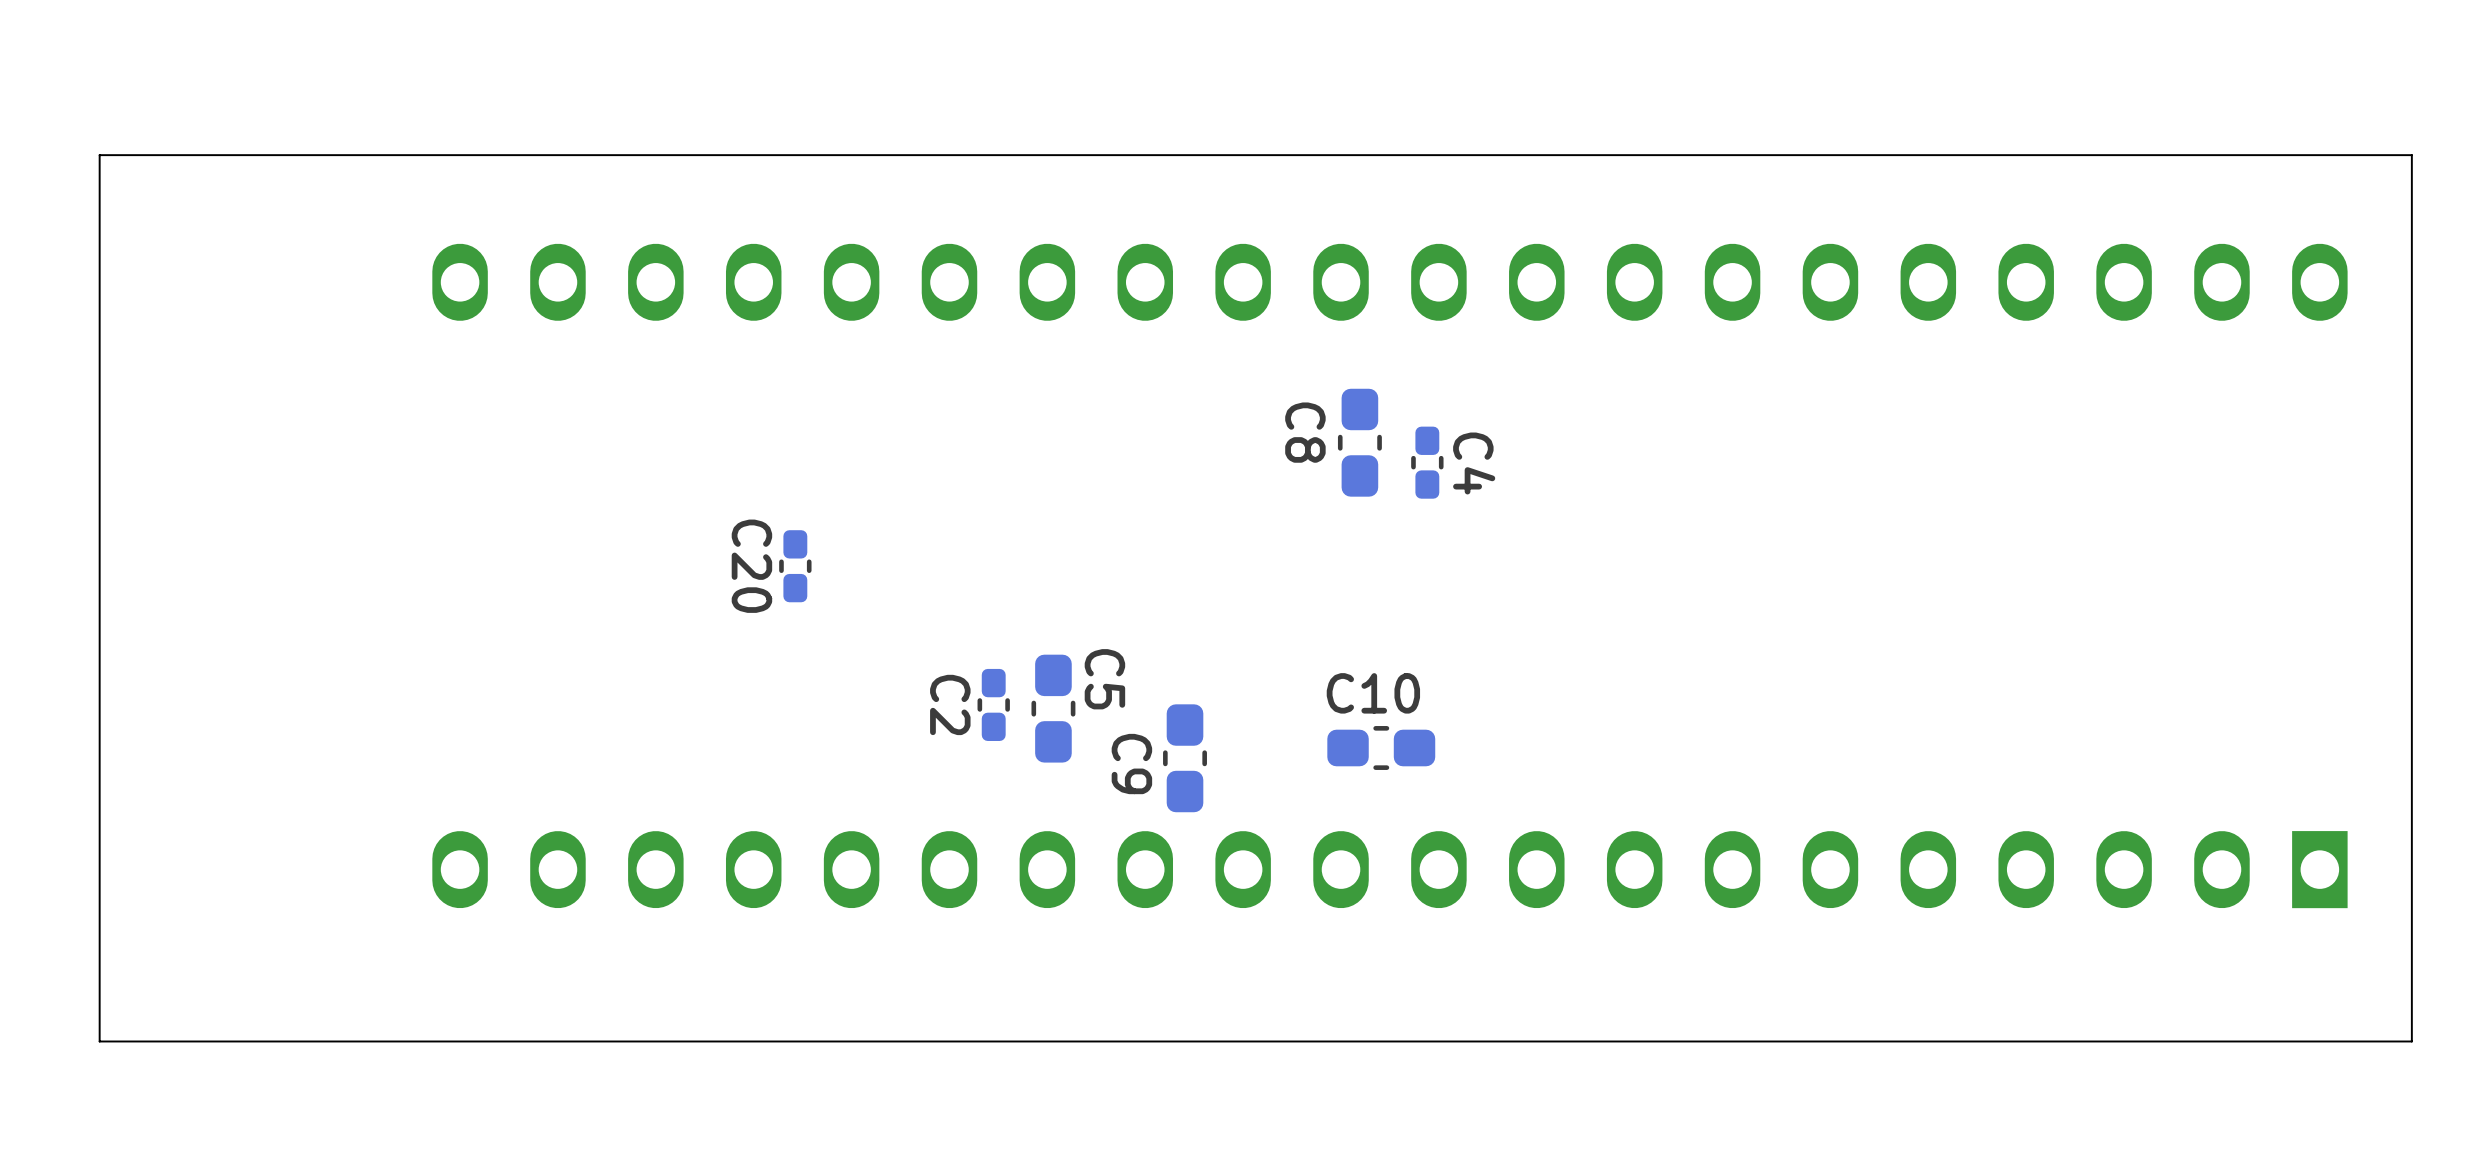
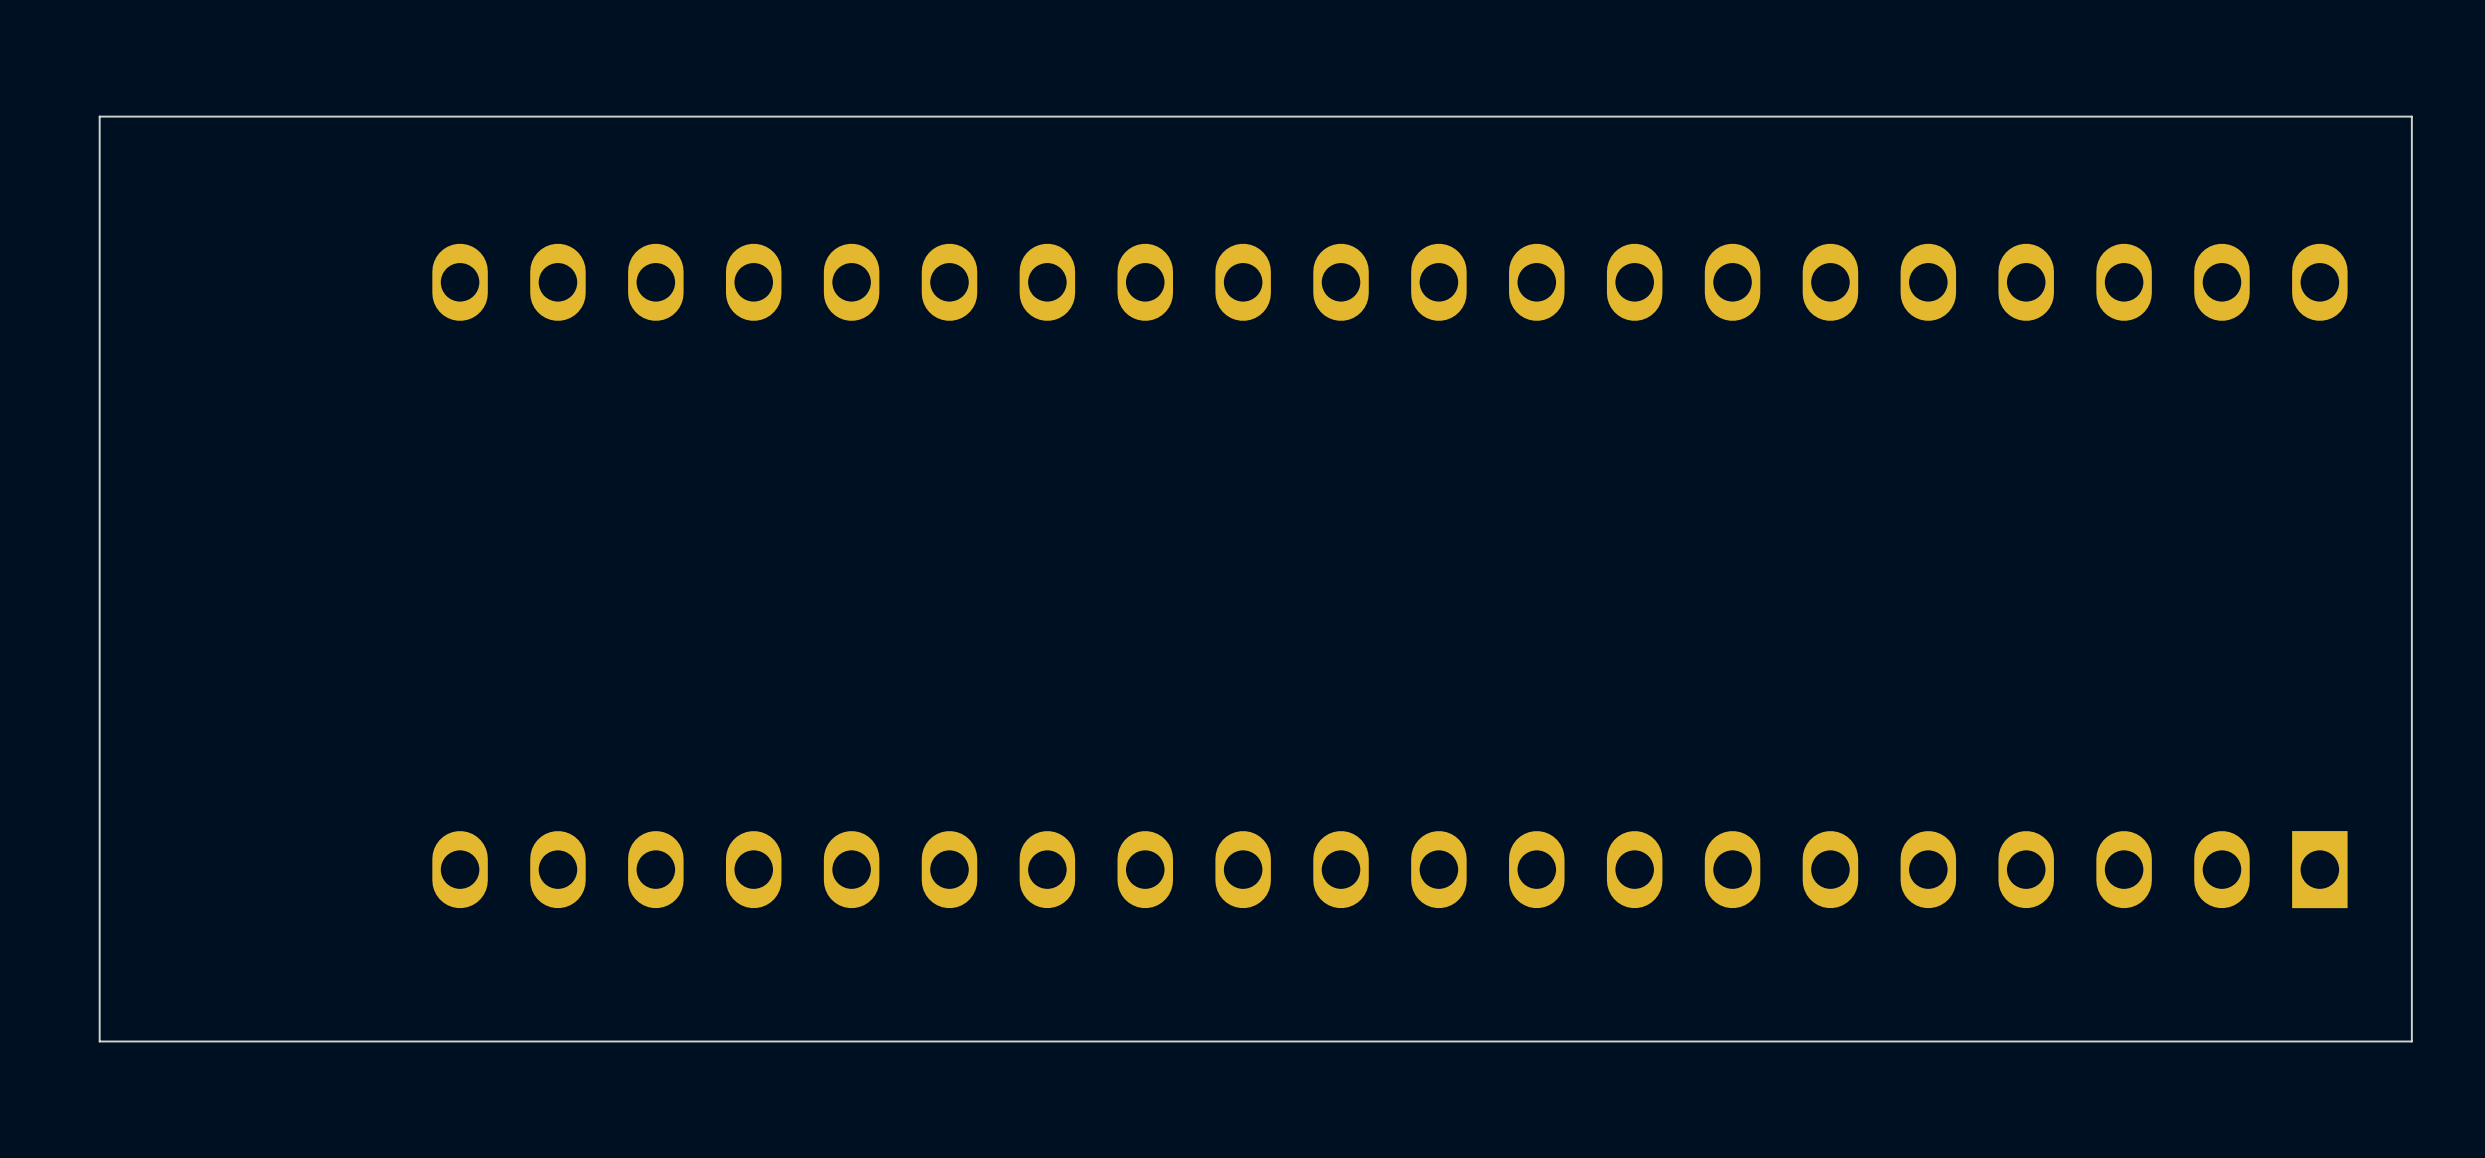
board edge: (2411, 155) (99, 155) -> (2411, 155) (2411, 116) (99, 116) (99, 155)
C8: (1359, 442) -> none
C4: (1427, 462) -> none
C20: (795, 566) -> none
C2: (993, 704) -> none
C5: (1053, 708) -> none
C10: (1381, 747) -> none
C9: (1185, 758) -> none

